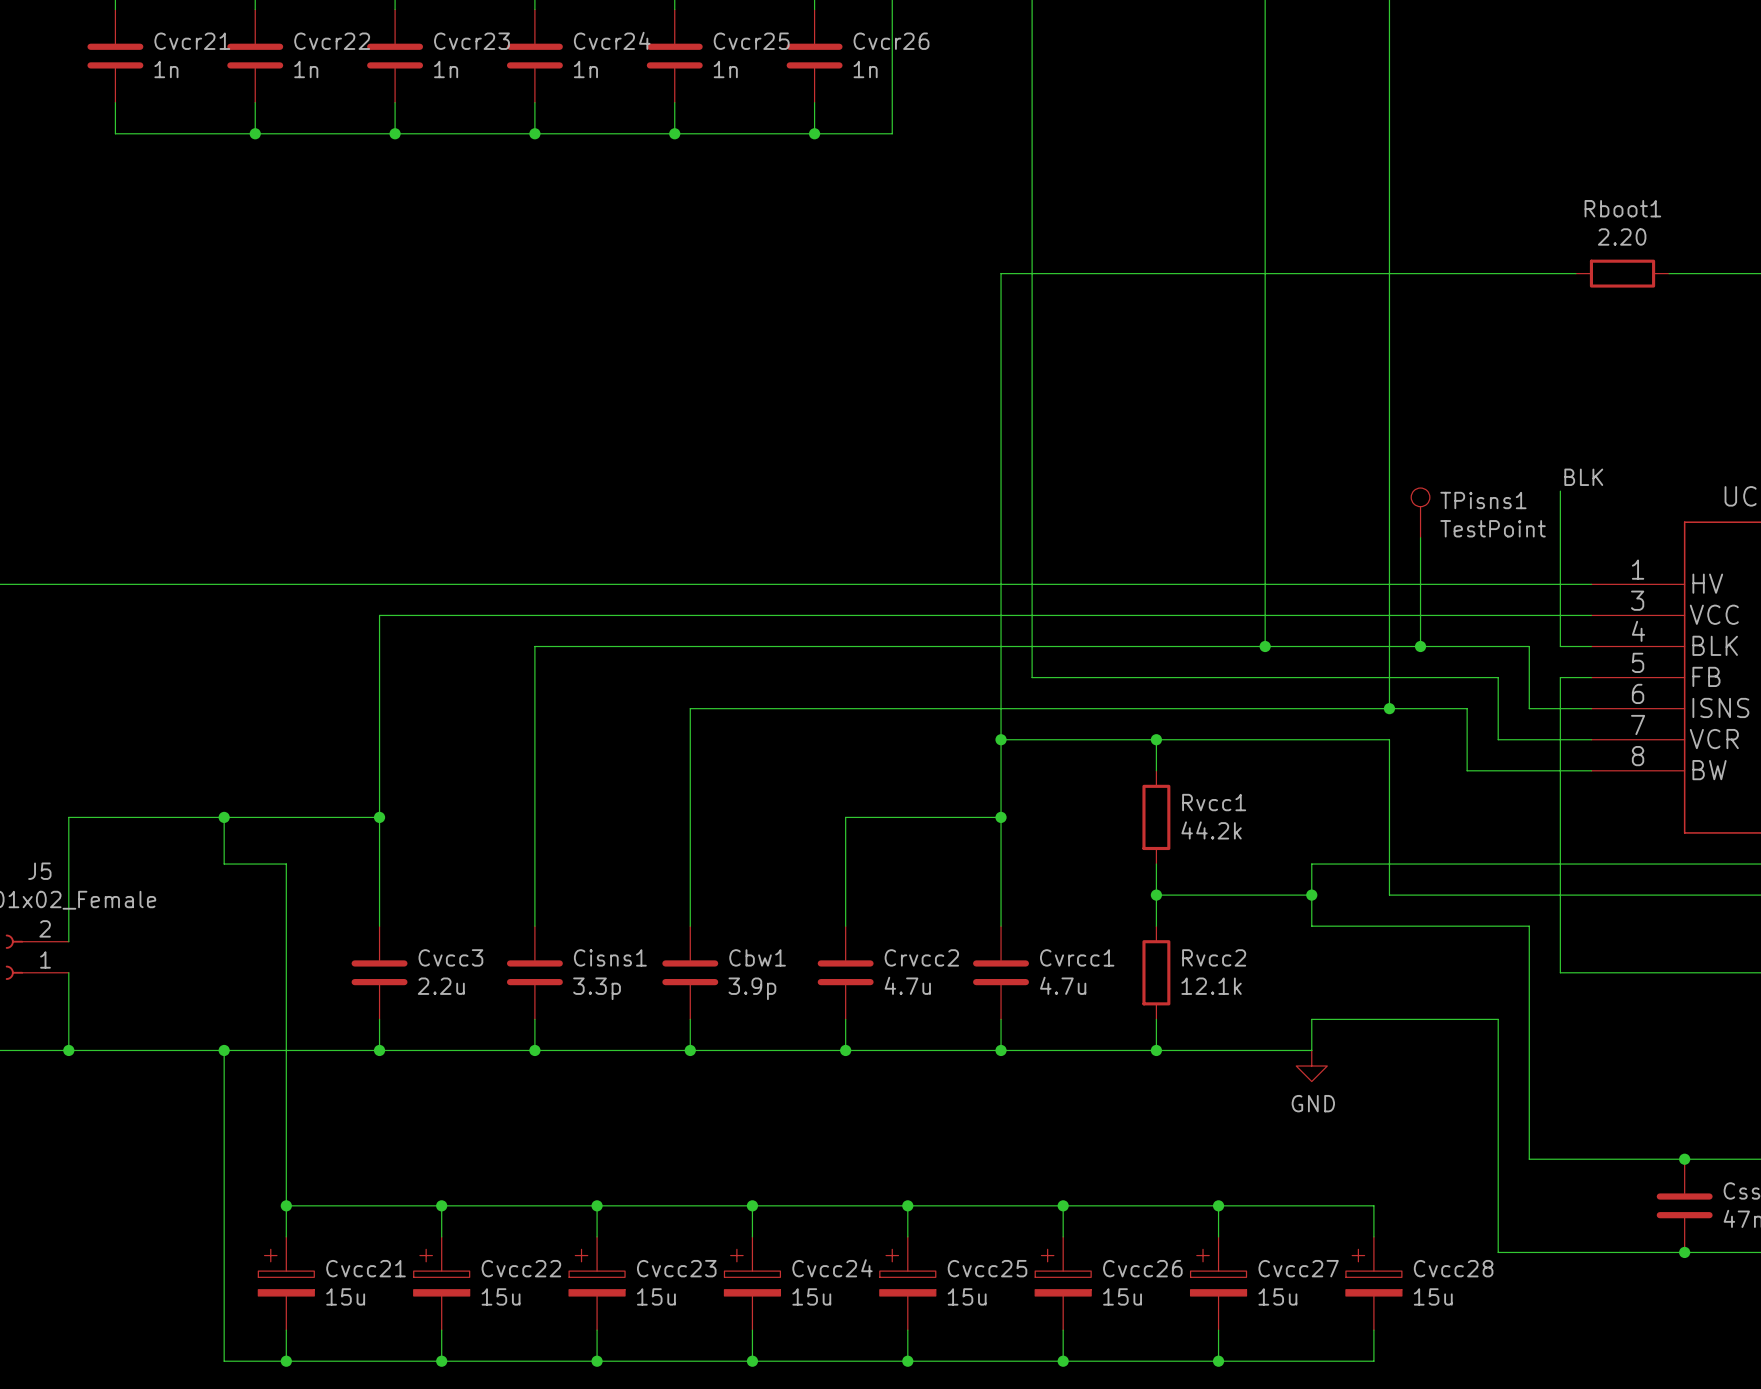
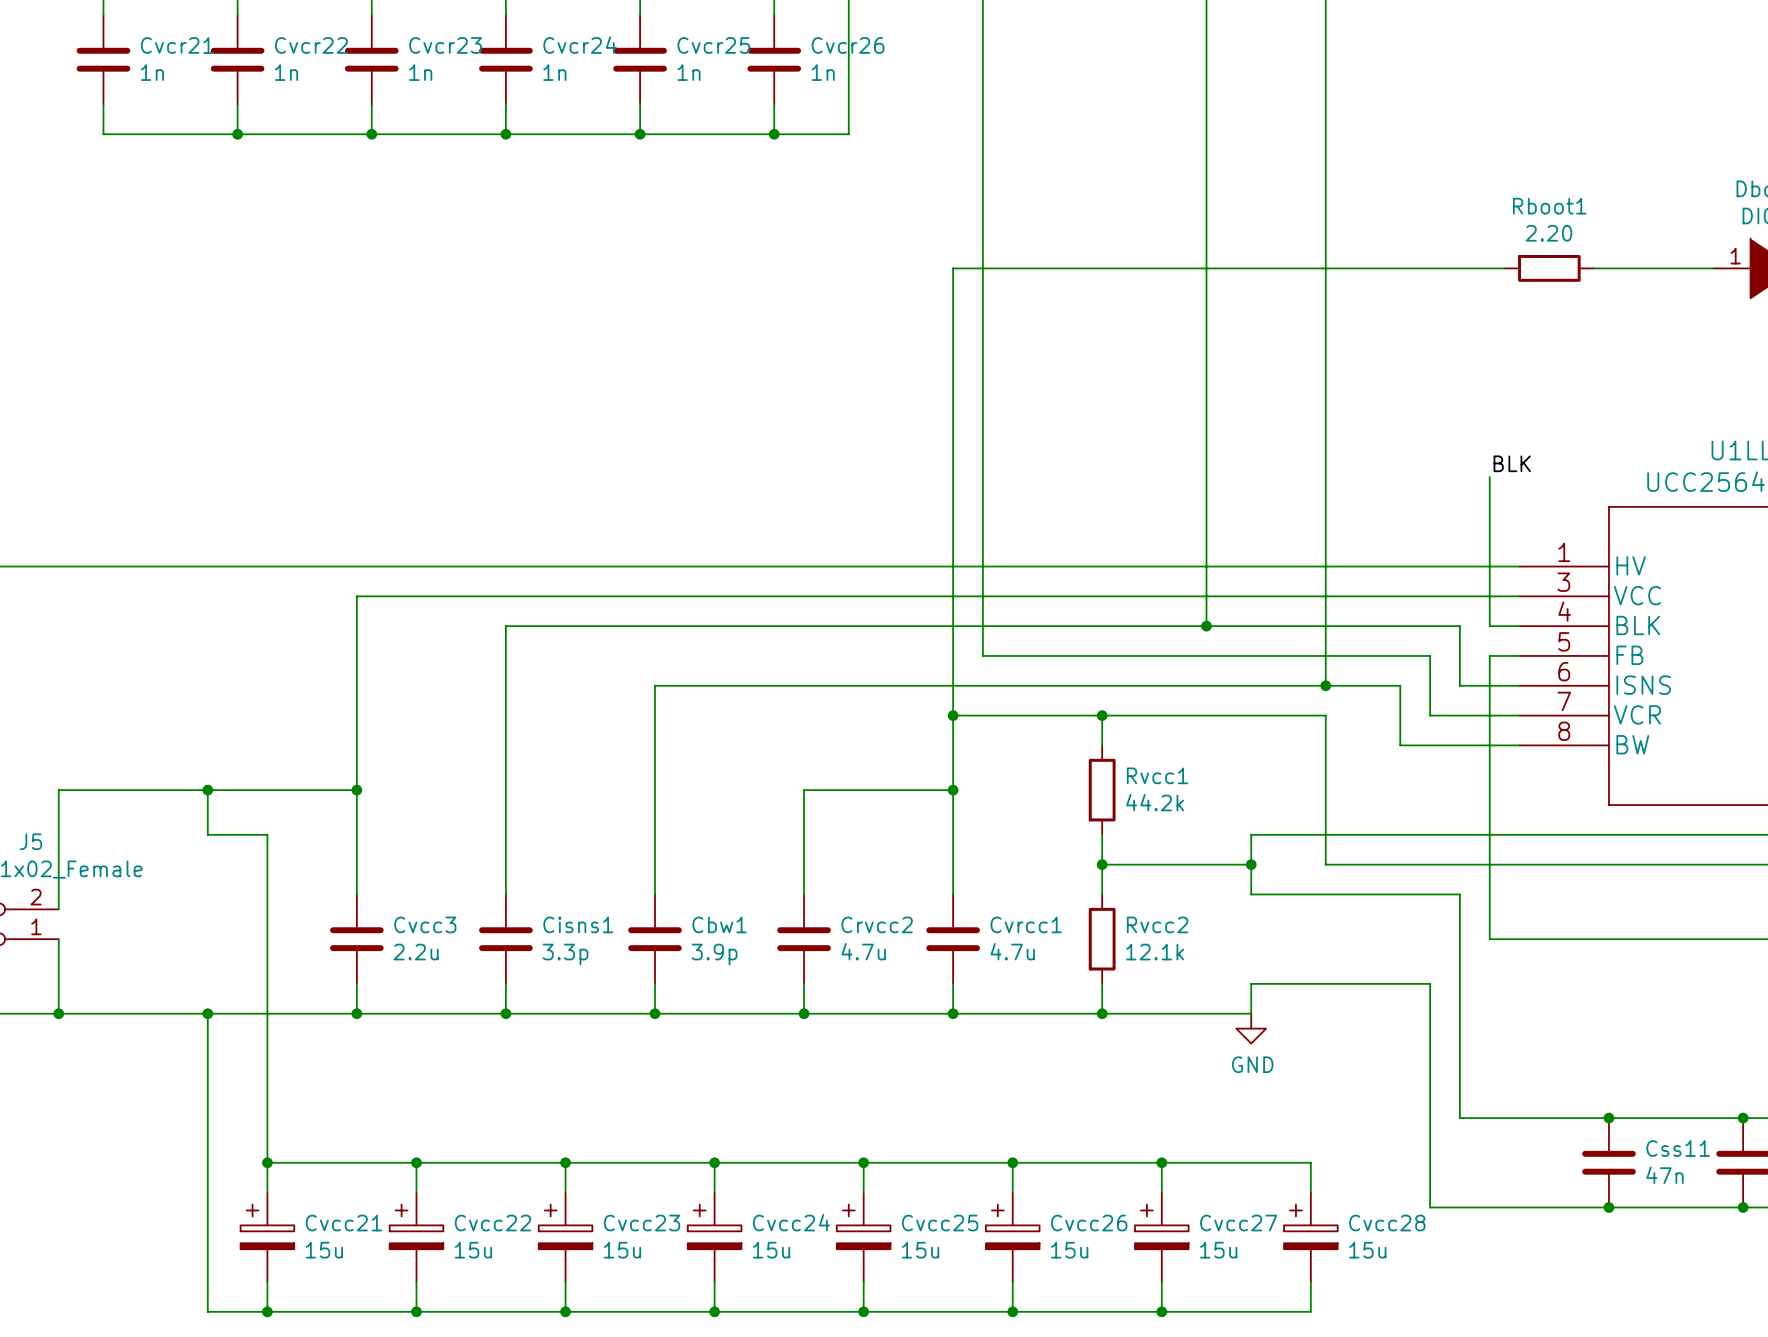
TPisns1: TestPoint (1420, 512) -> none
wire: (1420, 537) (1420, 646) -> none
junction: (1420, 646) -> none

